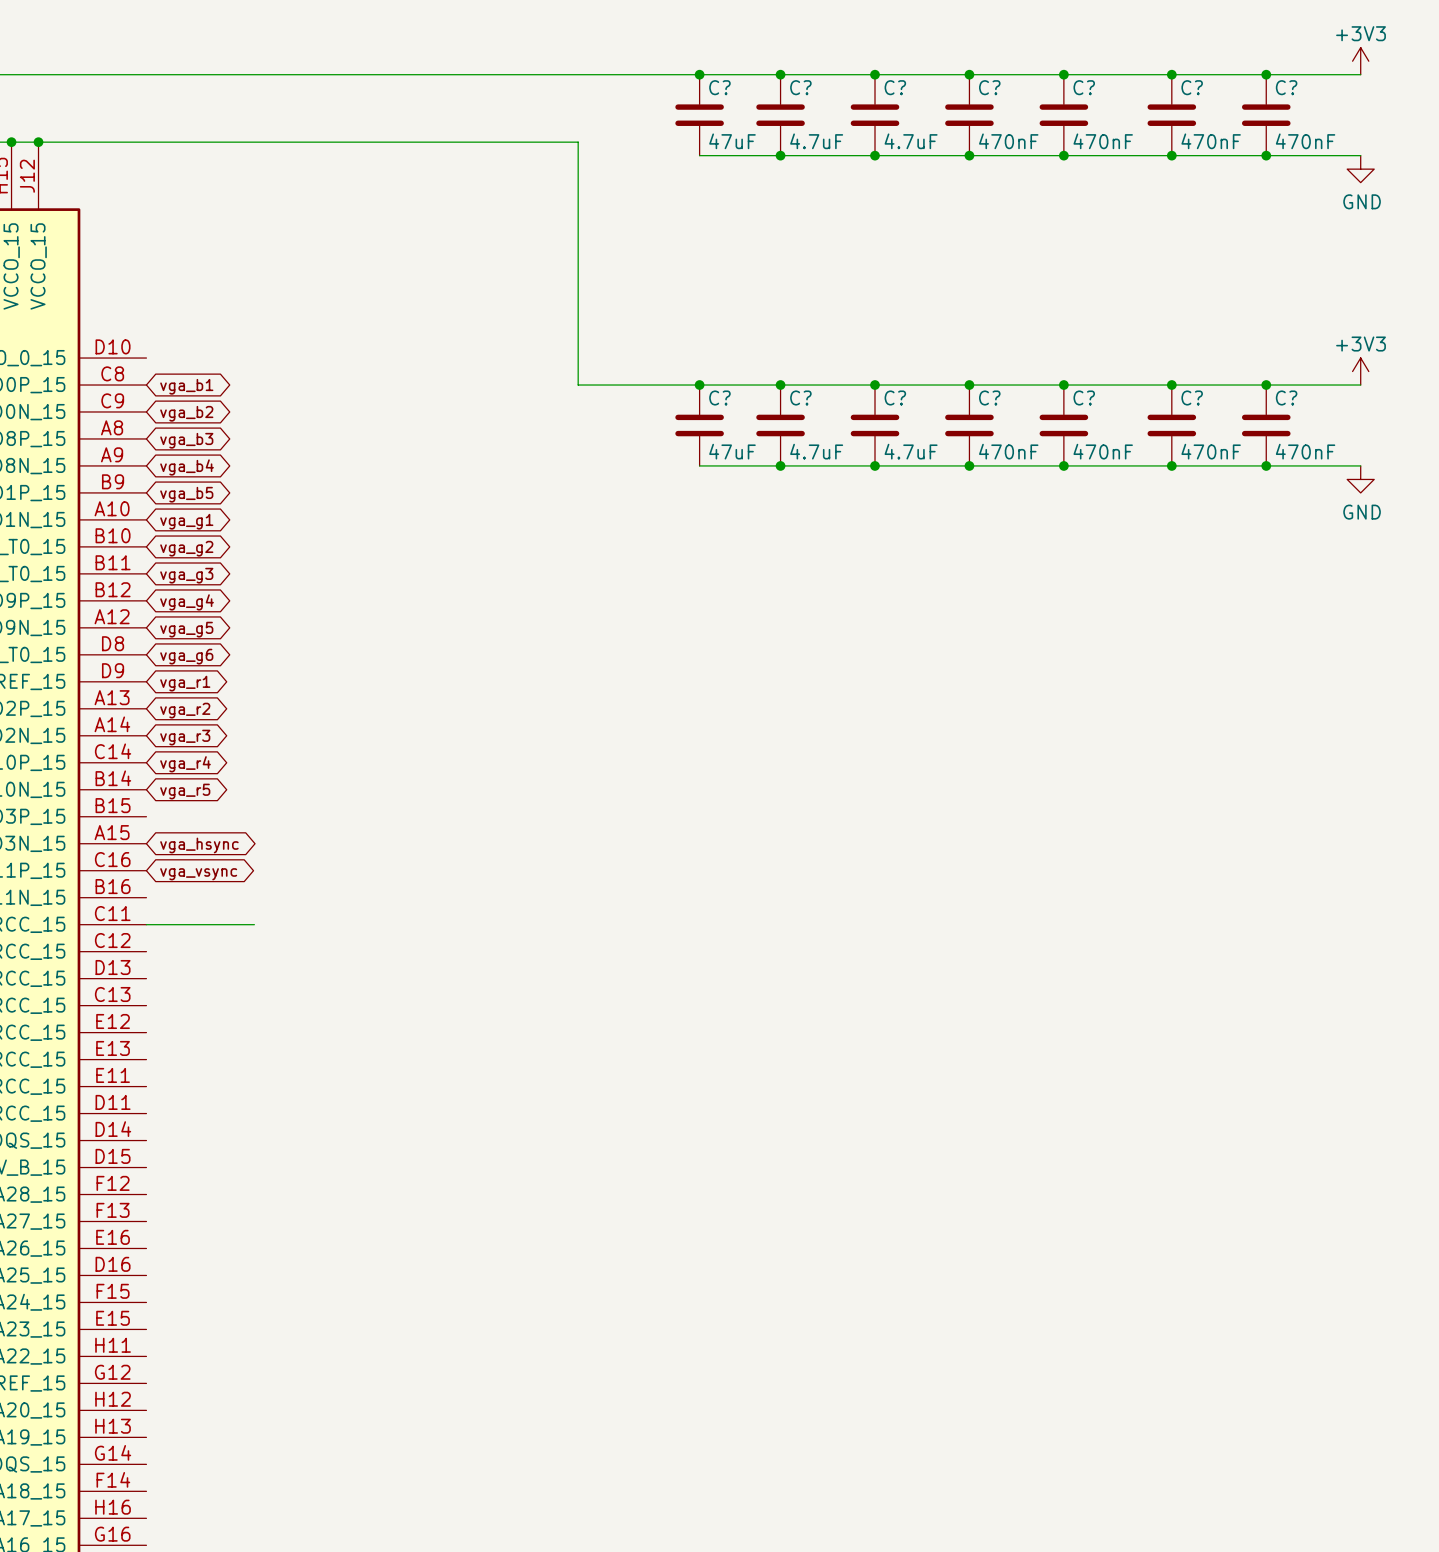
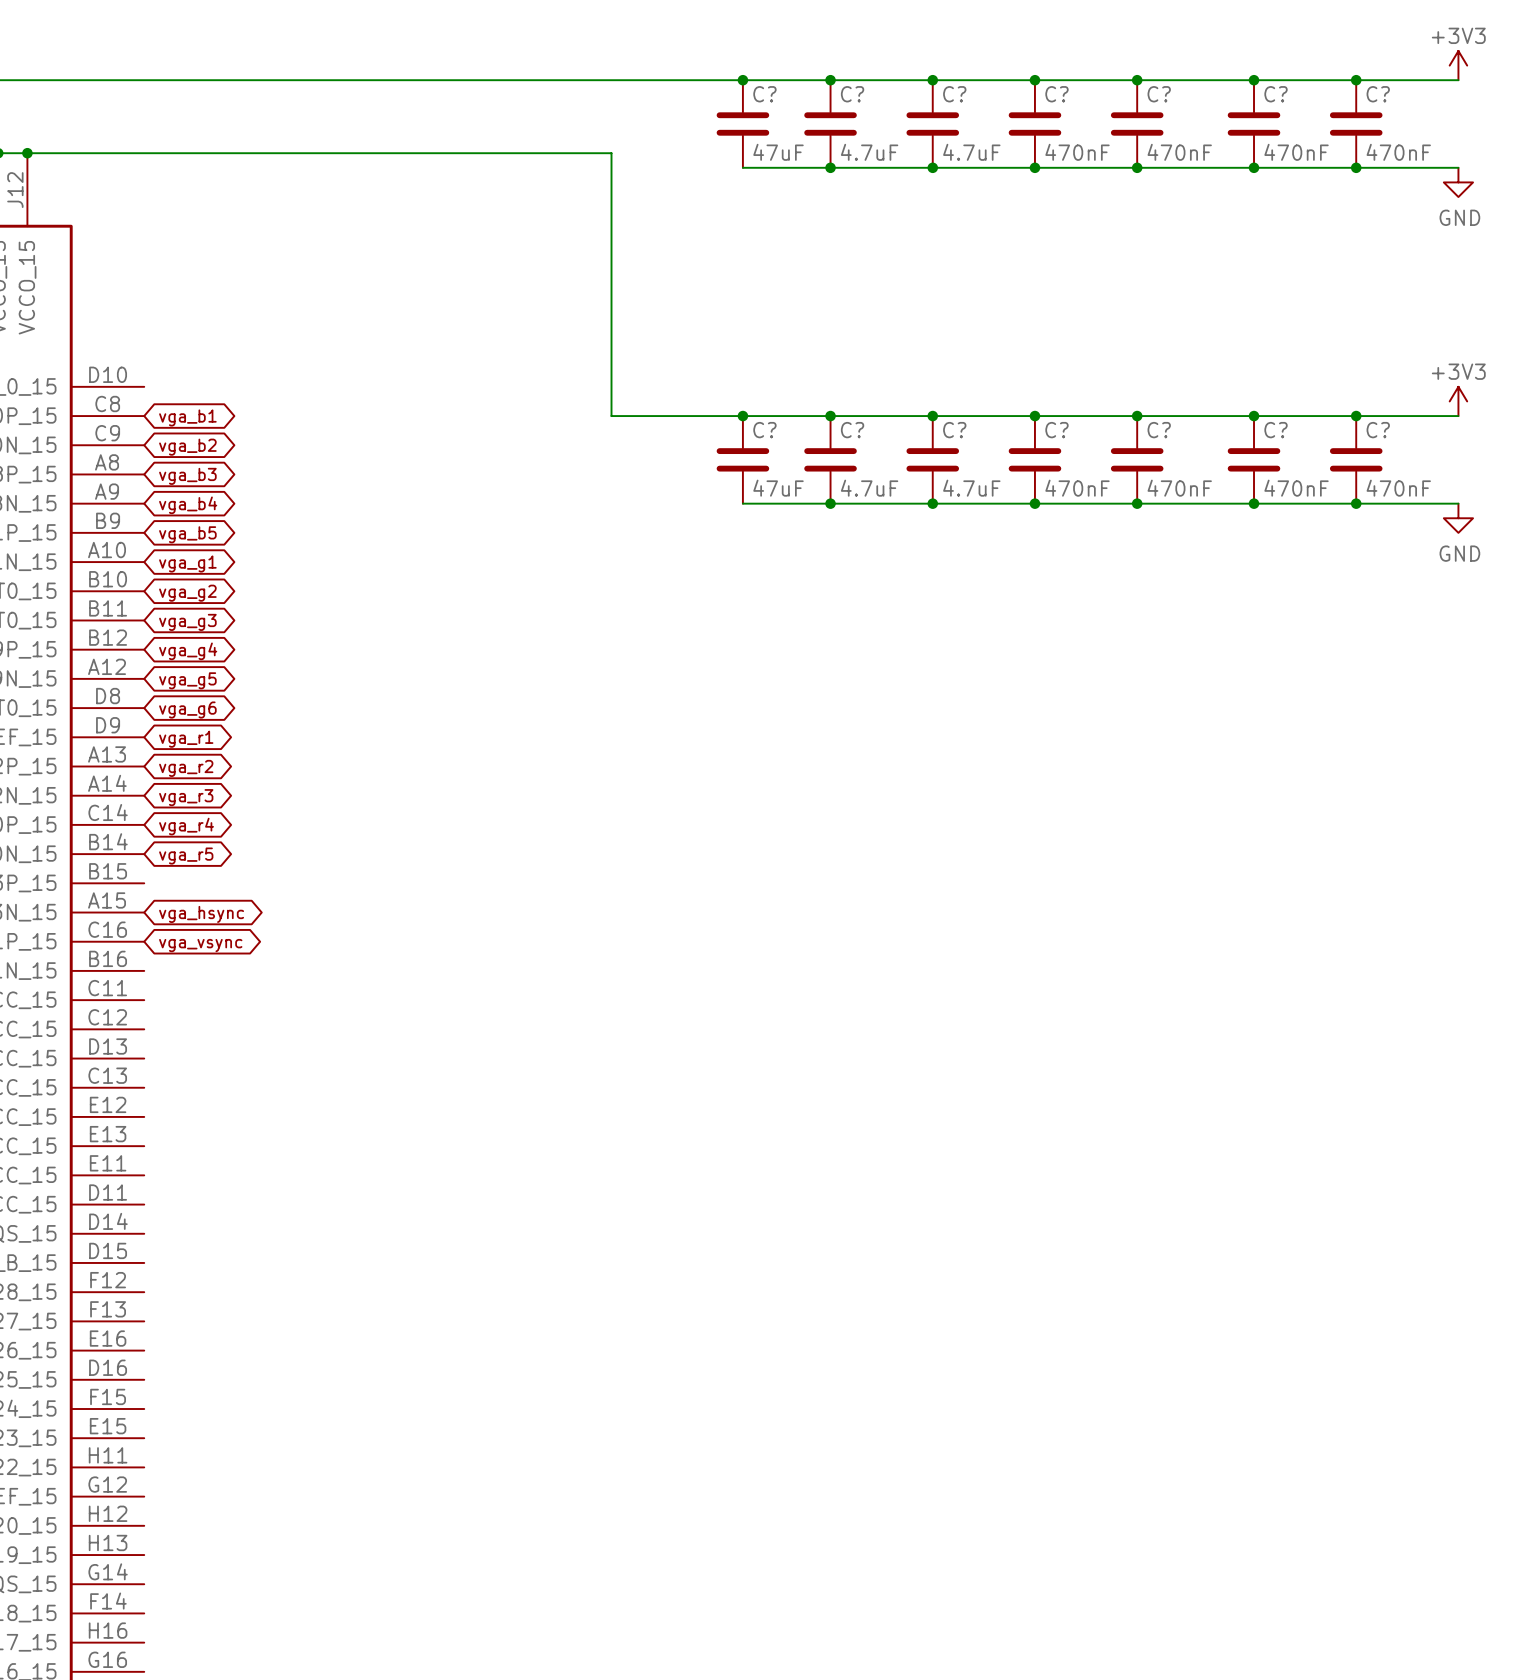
wire: (146, 924) (254, 924) -> none

